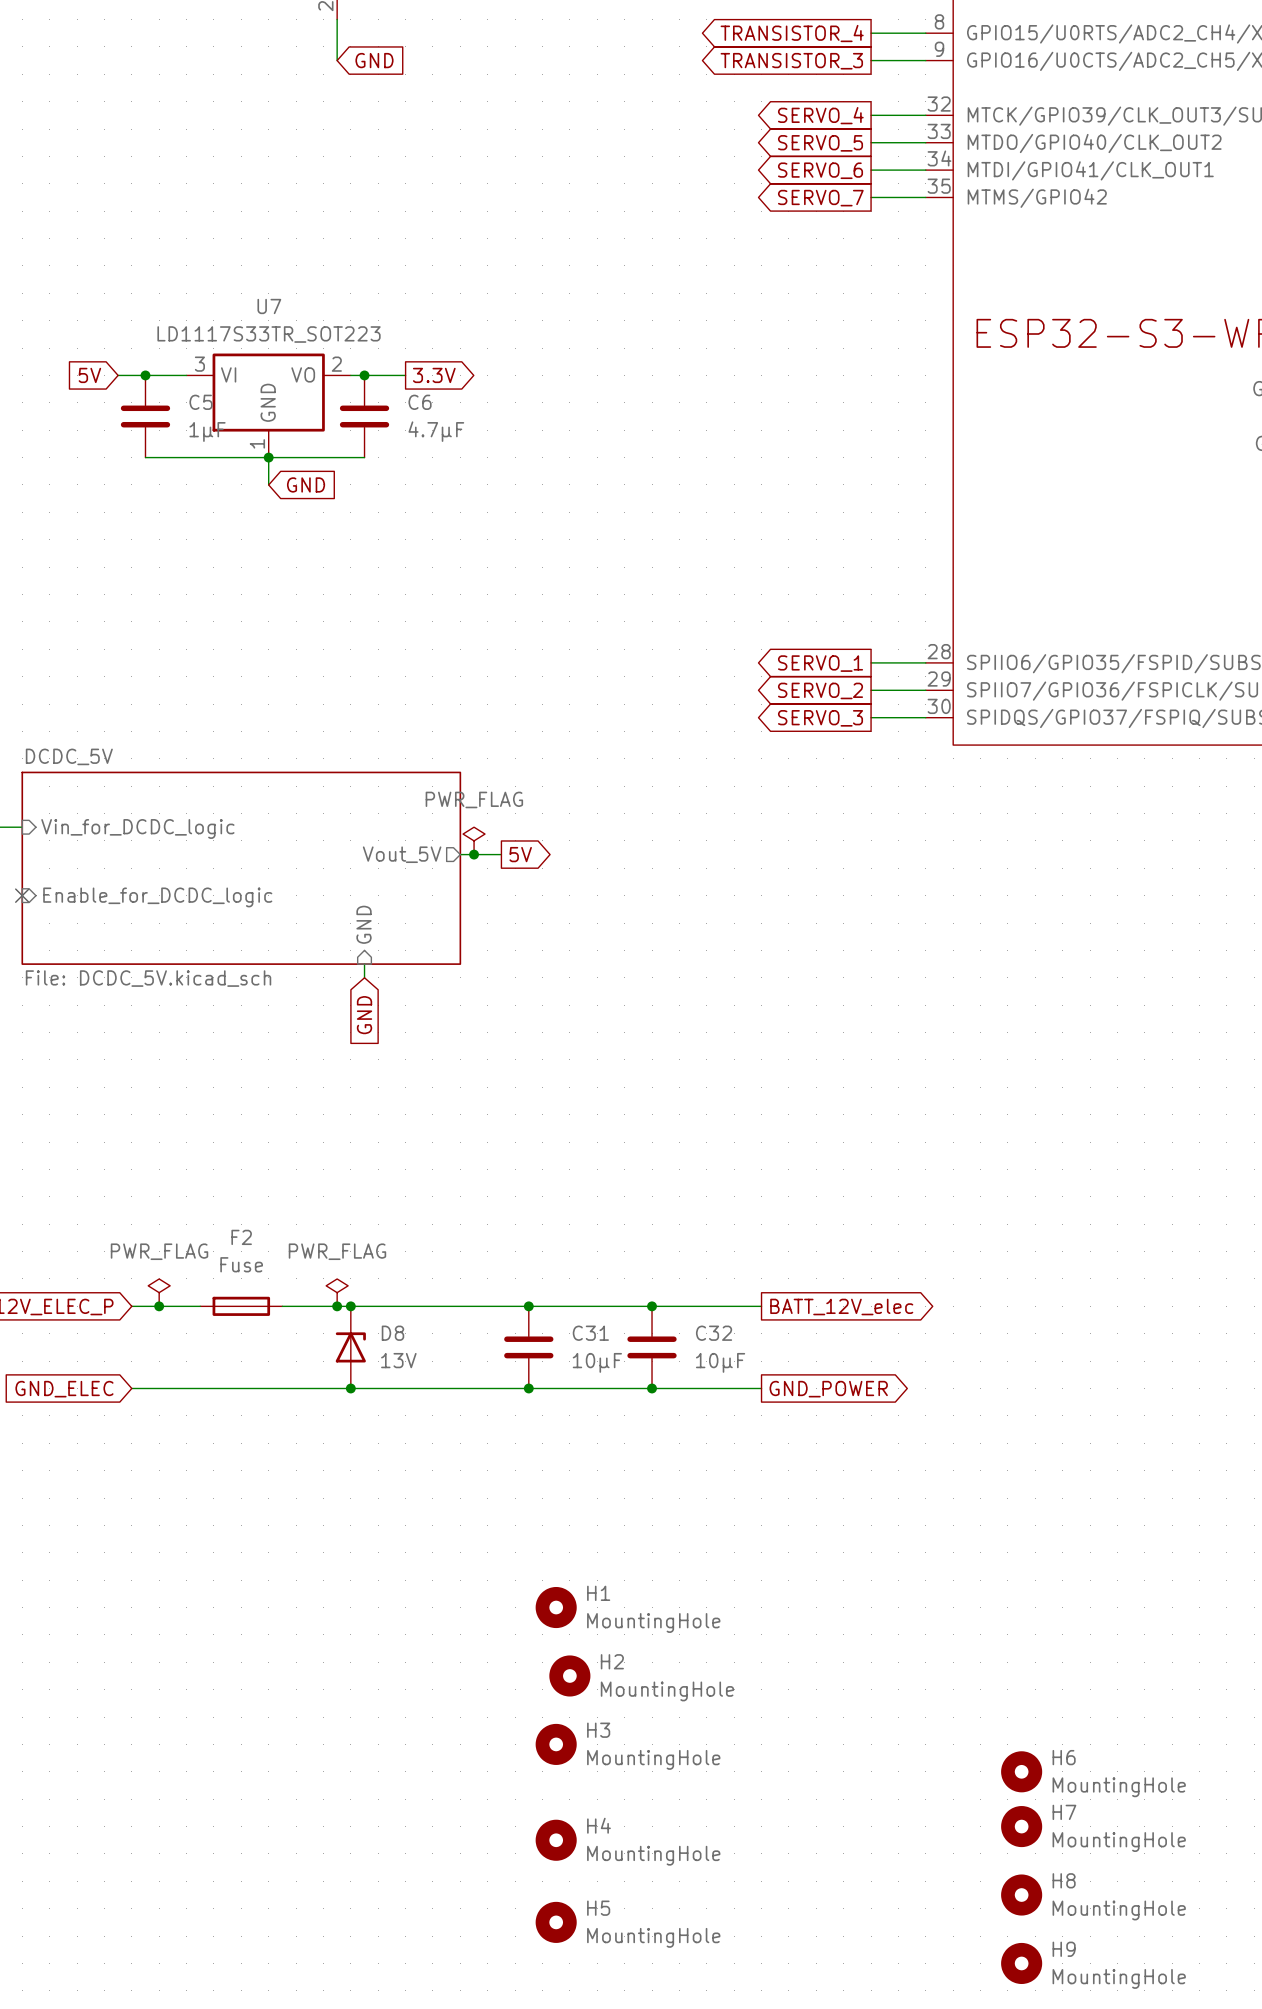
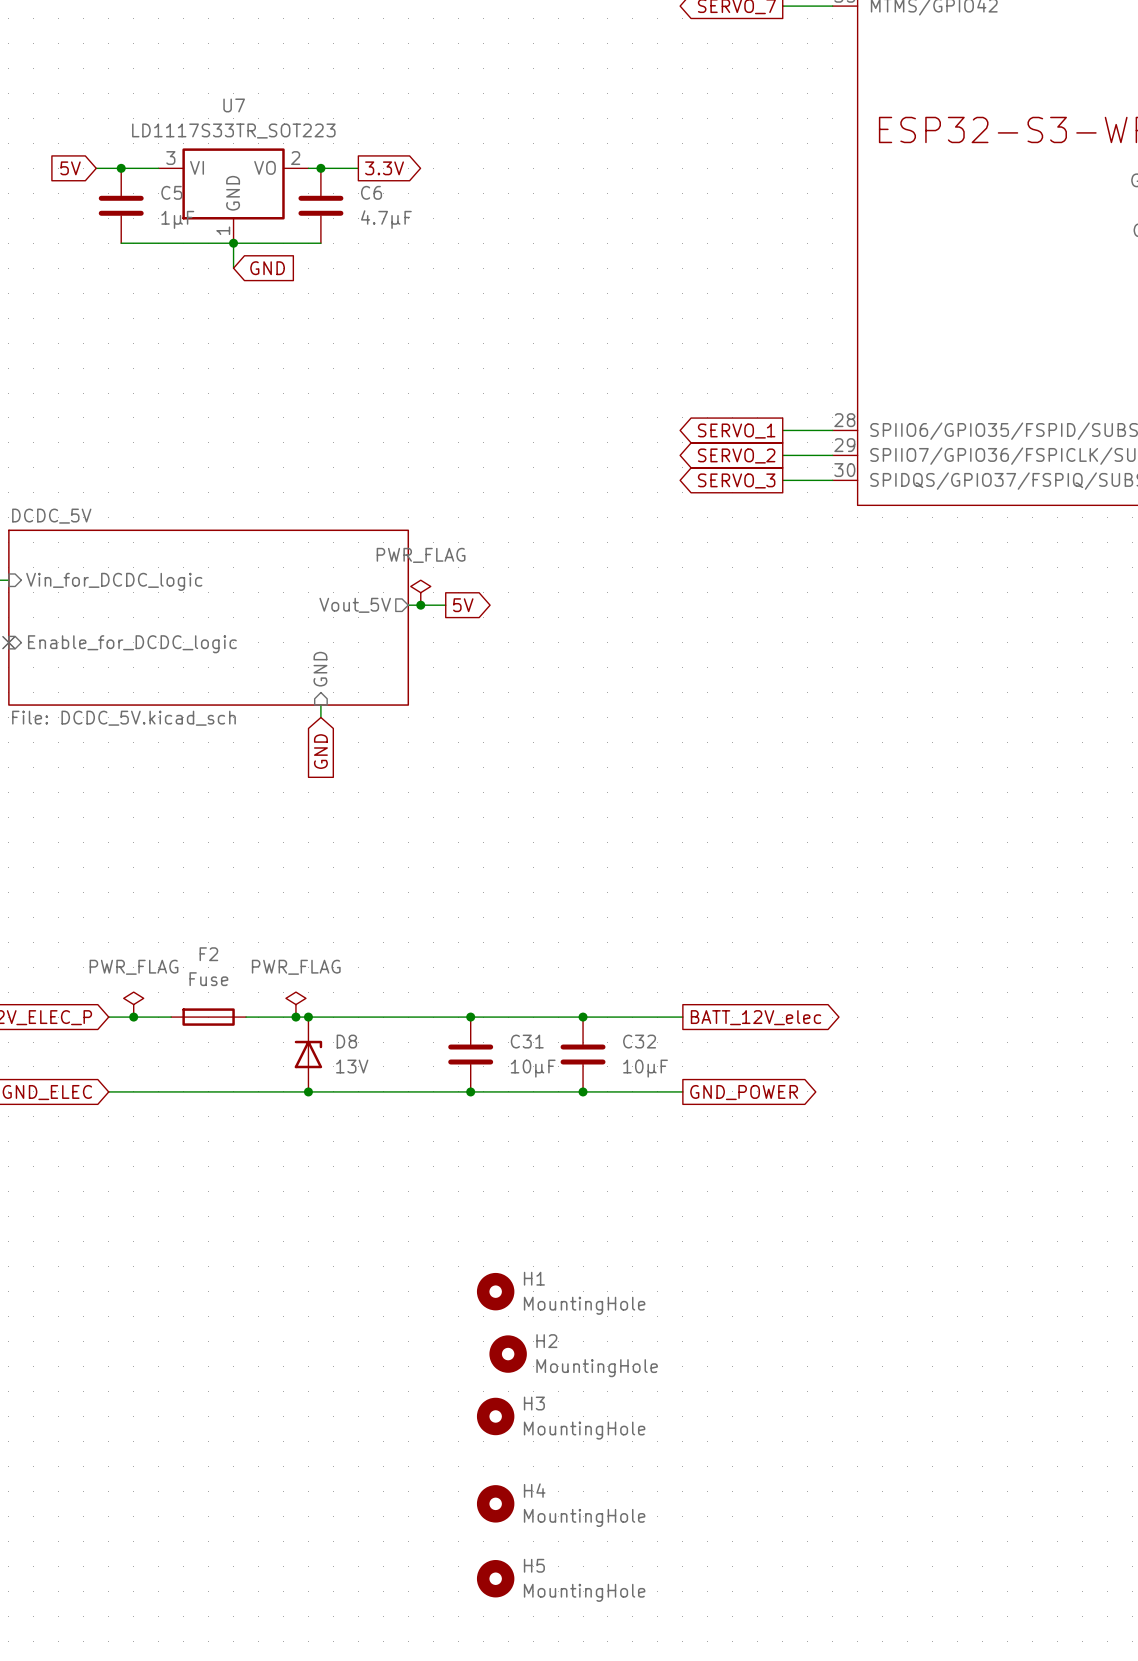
H6: MountingHole (1021, 1771) -> none
H7: MountingHole (1021, 1826) -> none
H8: MountingHole (1021, 1895) -> none
H9: MountingHole (1021, 1963) -> none

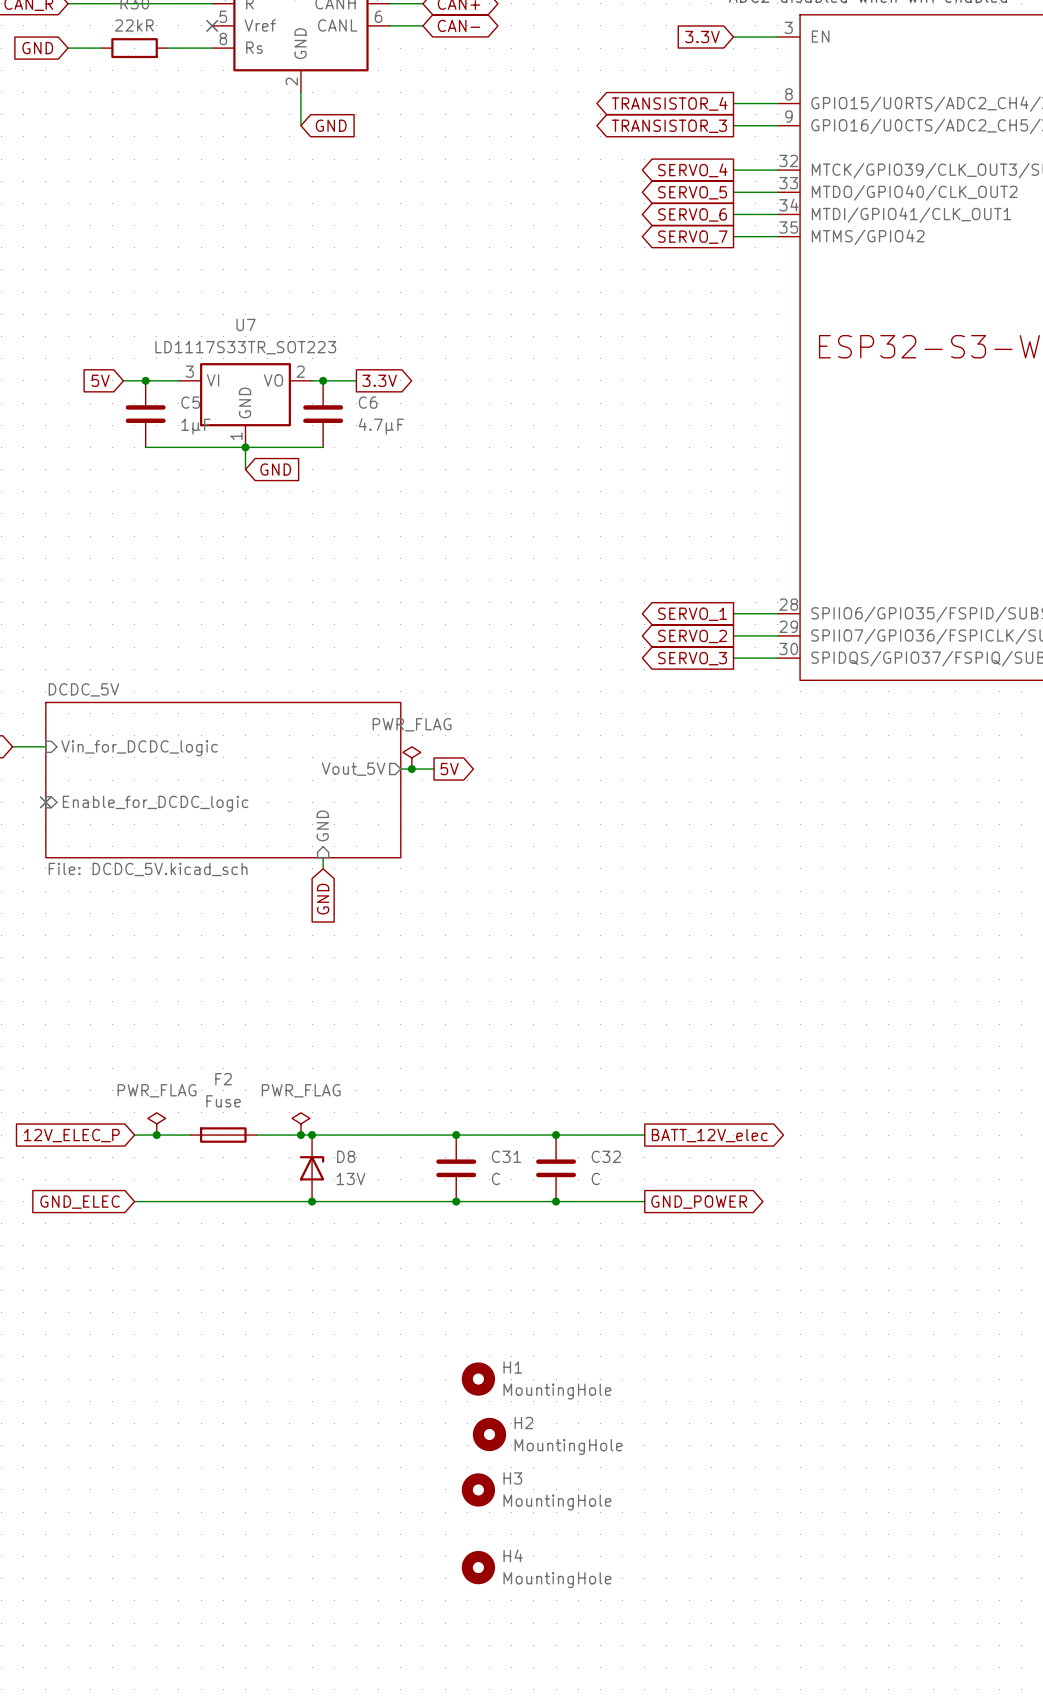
C31 value: 10µF (533, 1068) -> C (495, 1178)
C32 value: 10µF (645, 1068) -> C (595, 1178)
H5: MountingHole (495, 1578) -> none

